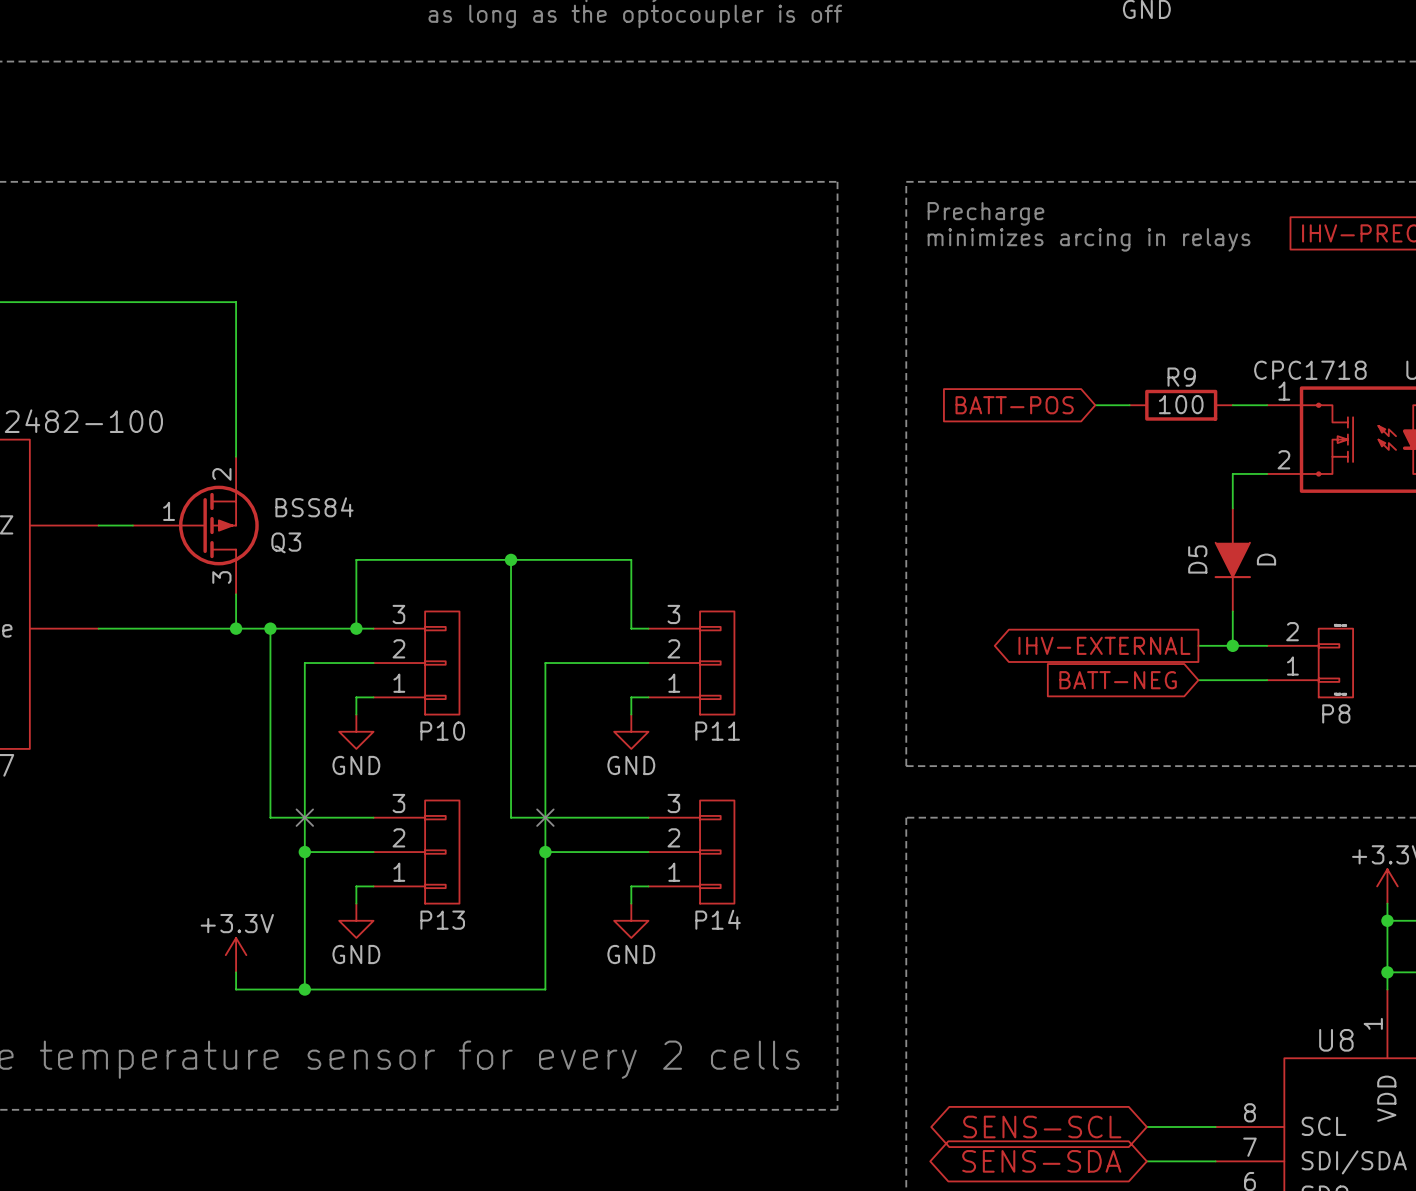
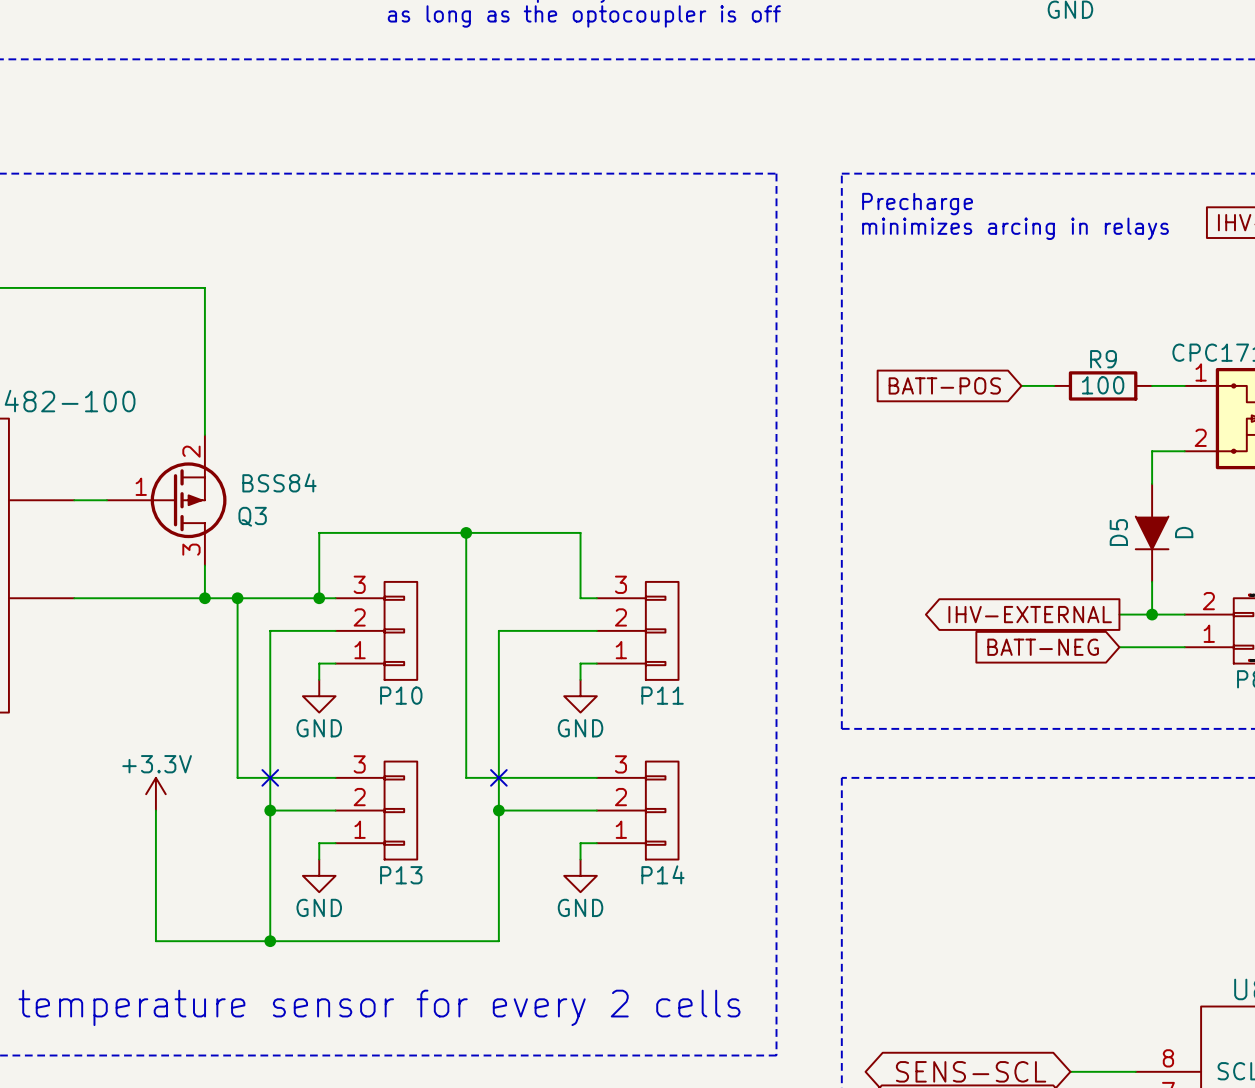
power symbol position: +3.3V (236, 955) -> +3.3V (155, 794)
wire: (236, 972) (236, 989) -> (155, 810) (155, 941) (204, 941)

